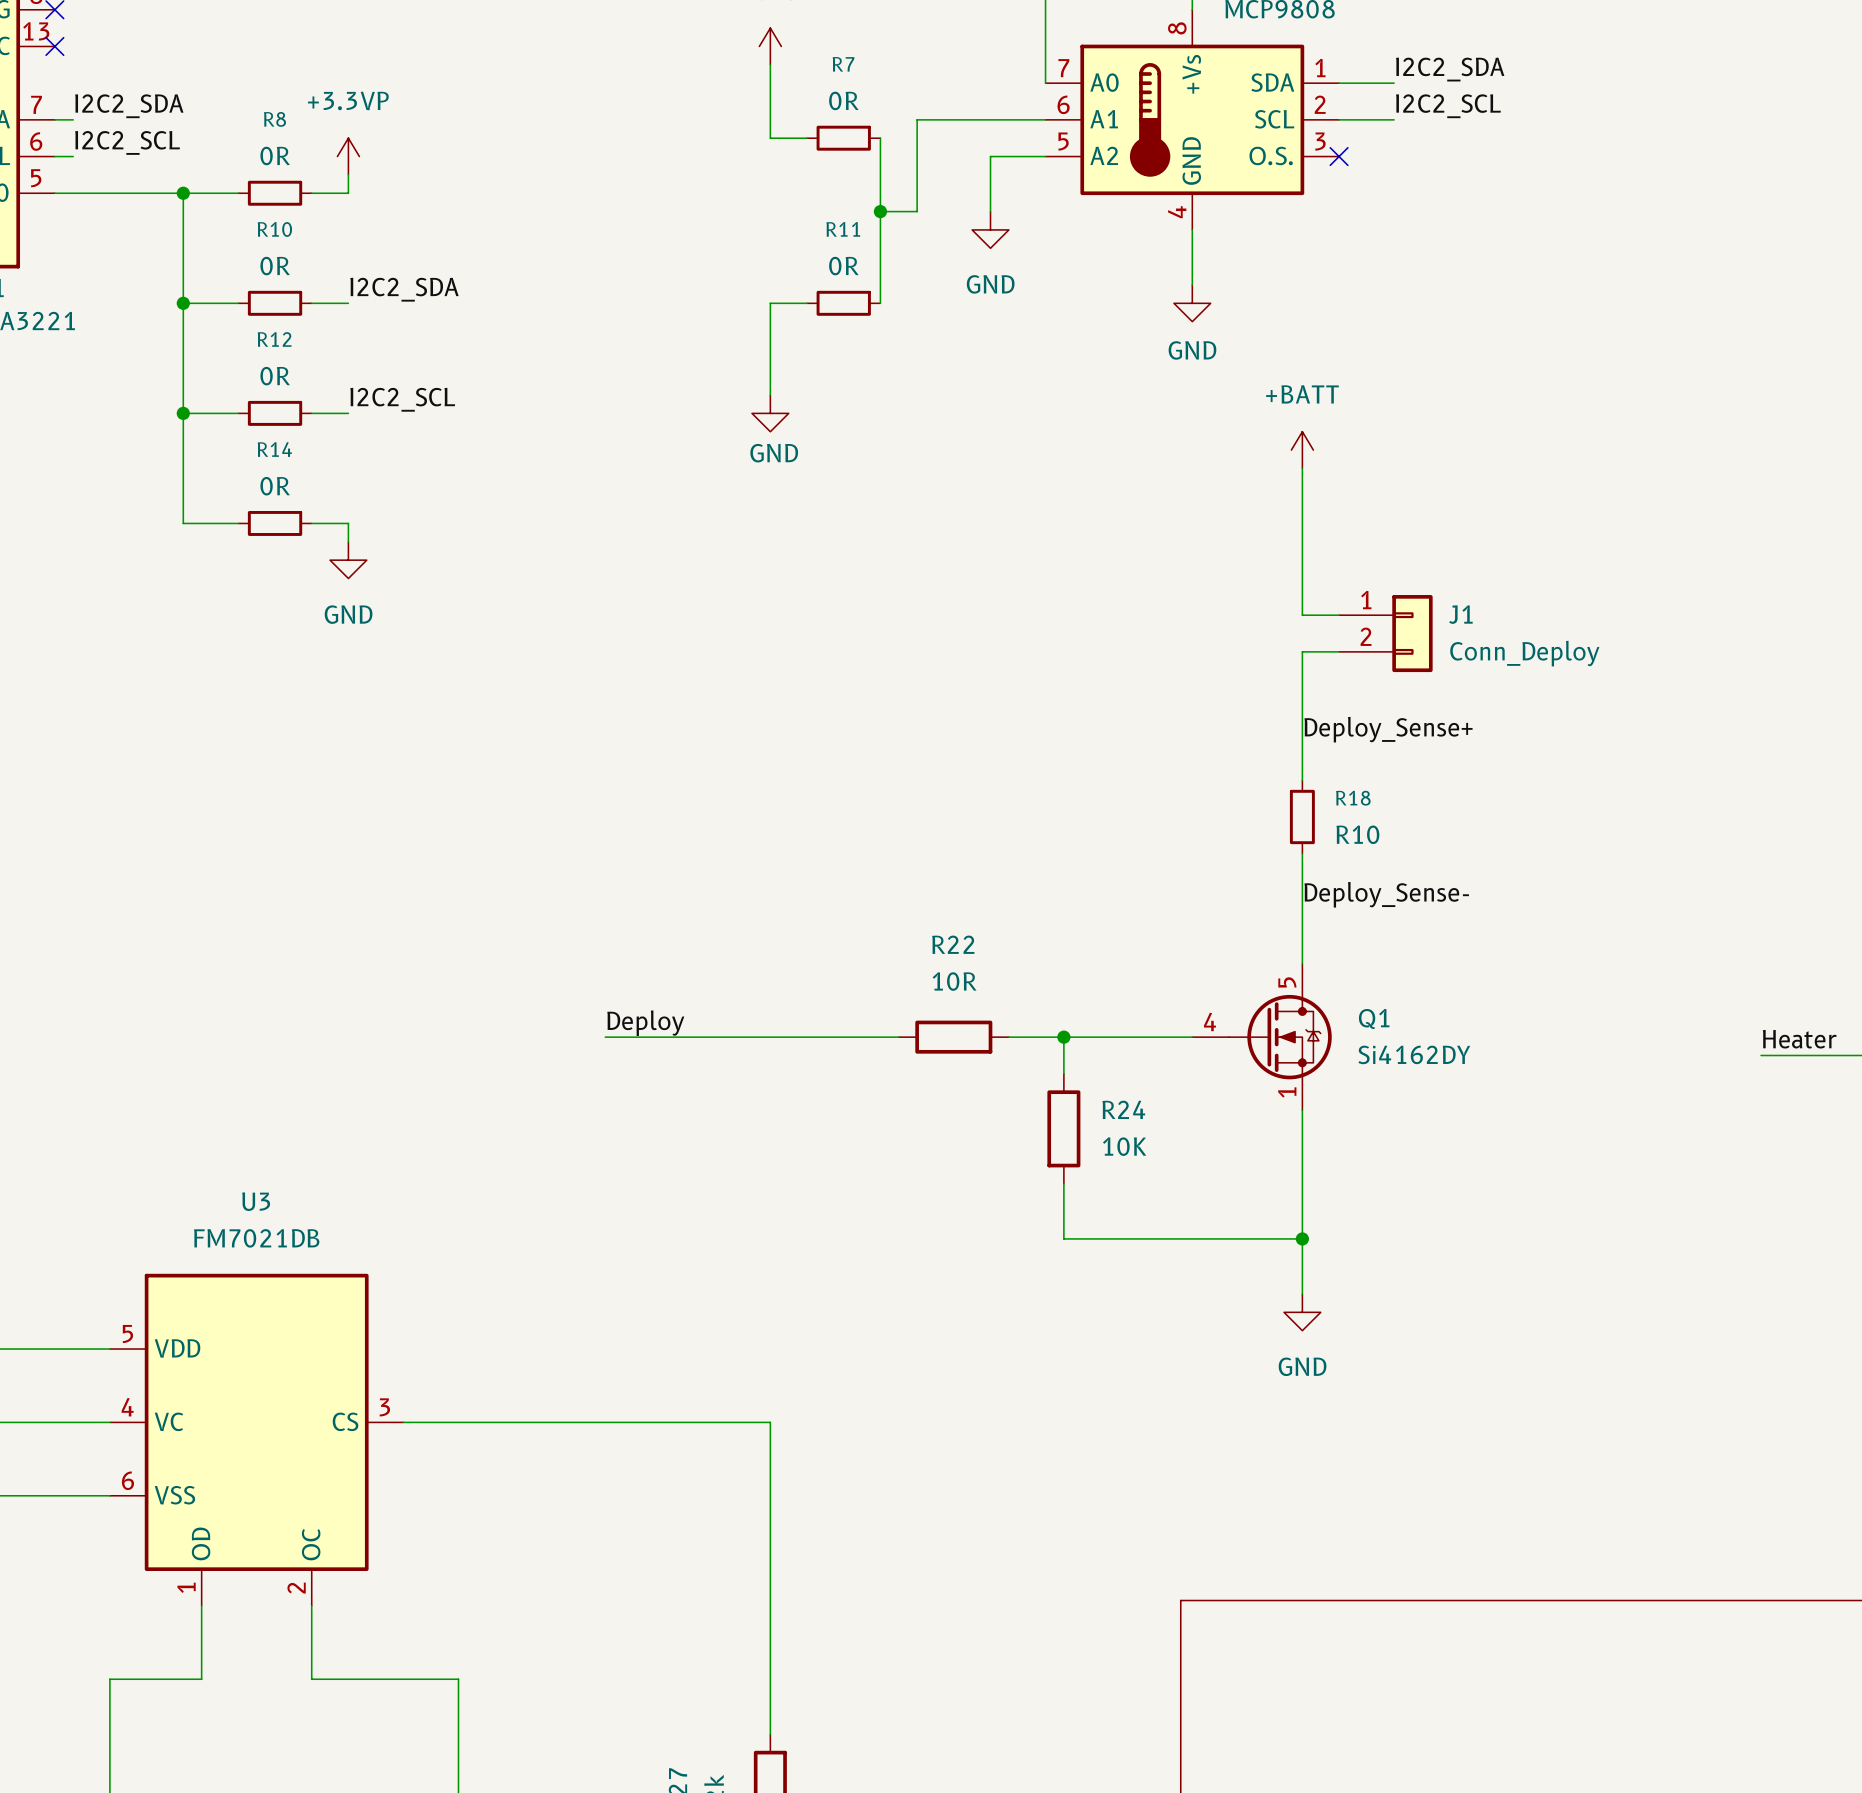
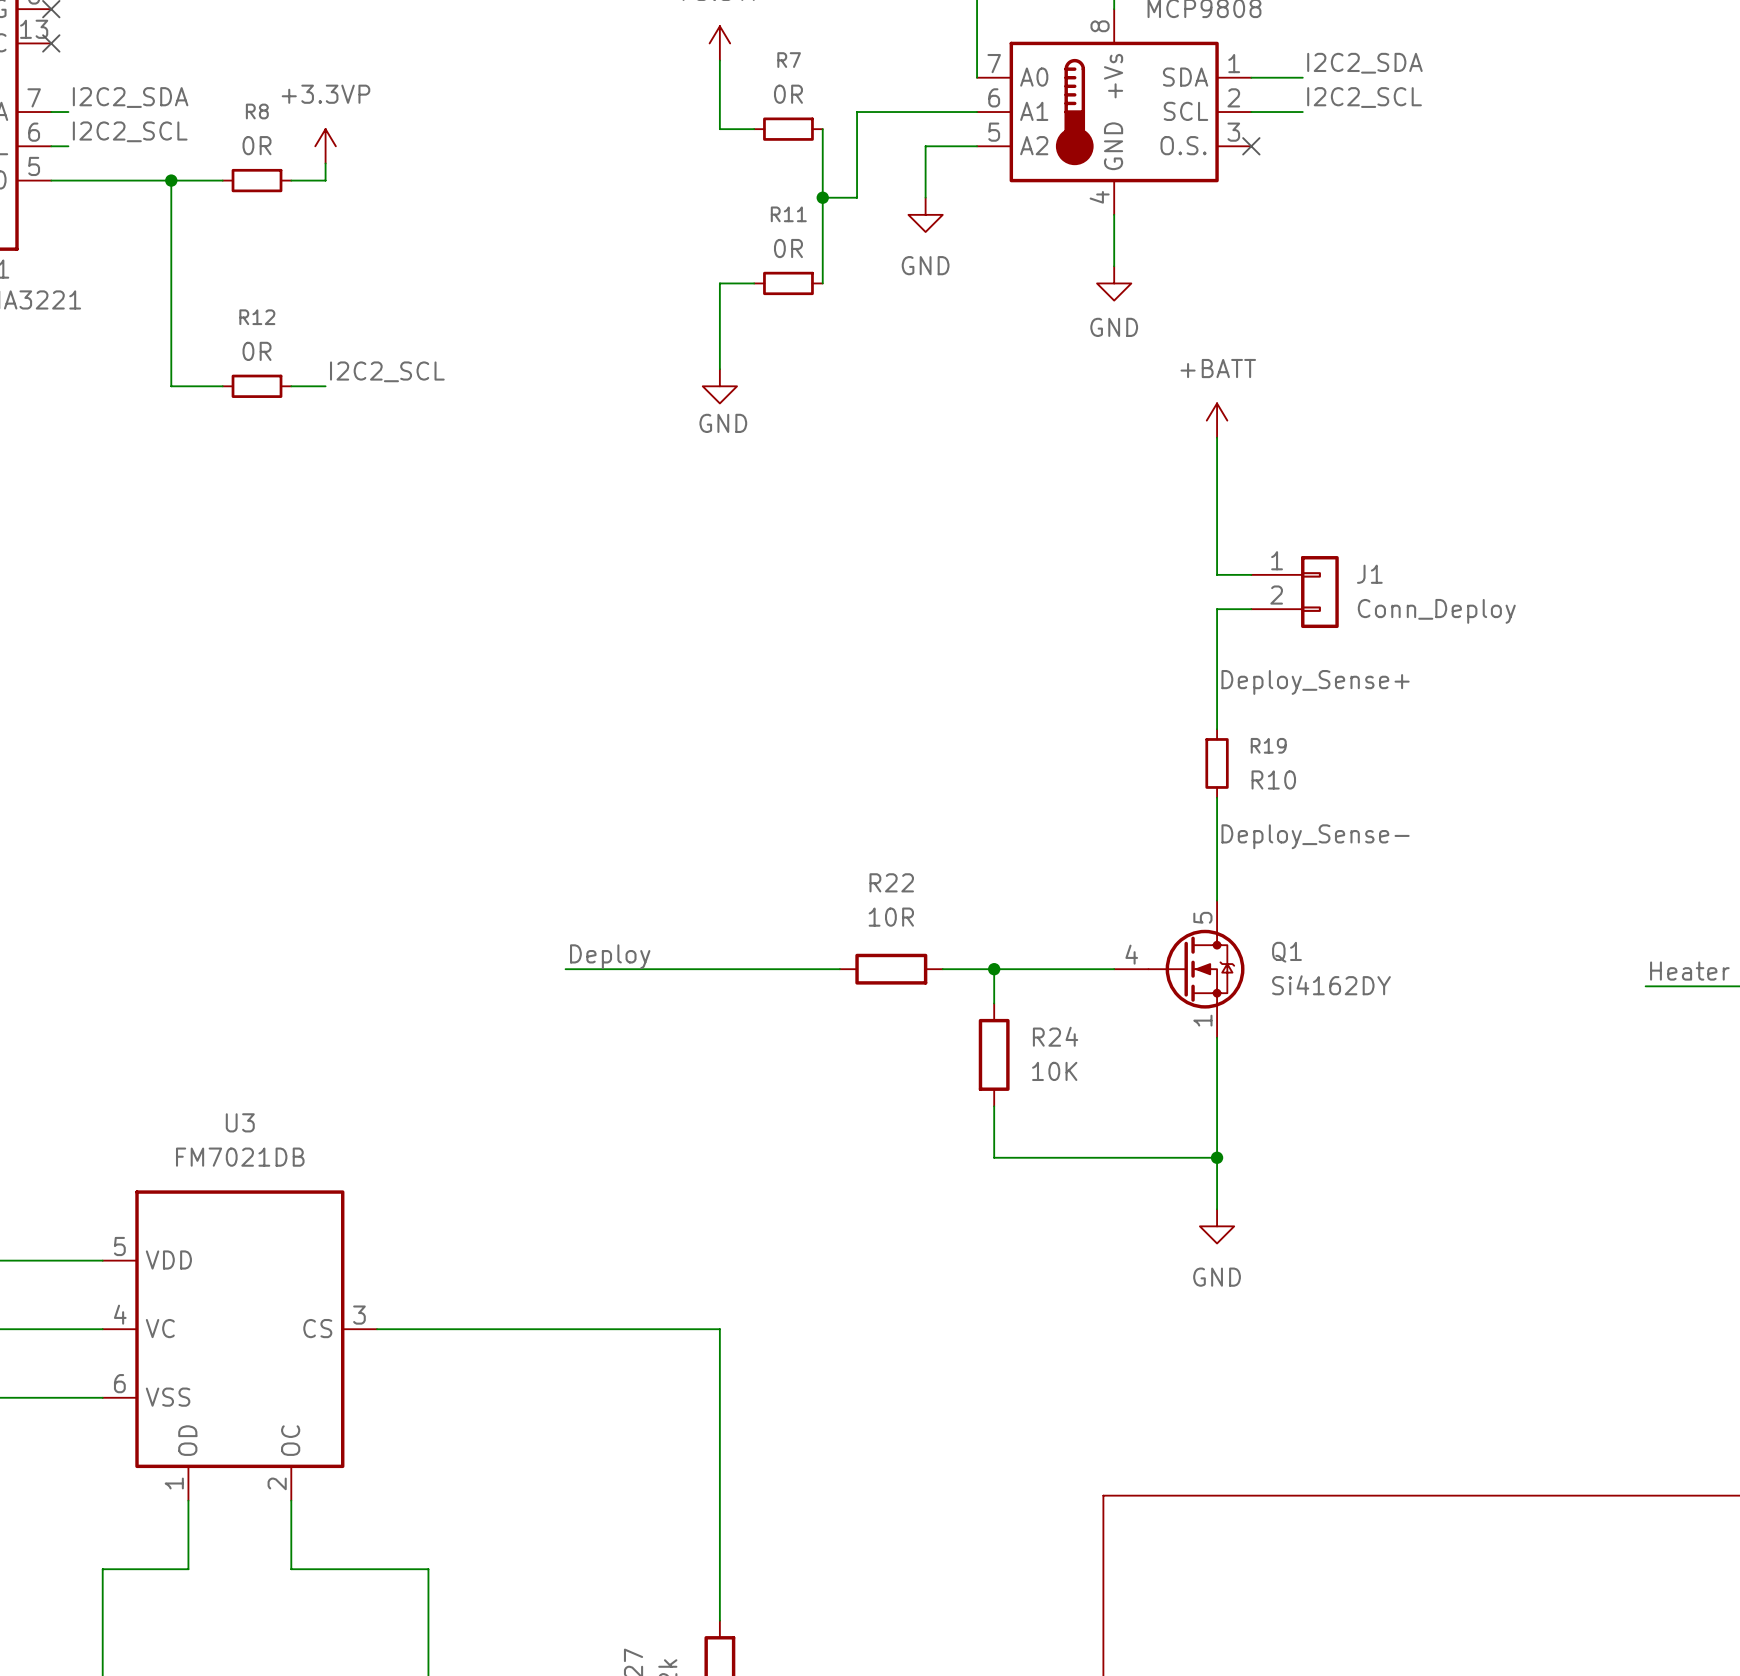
label: I2C2_SDA (404, 289) -> none
wire: (183, 303) (238, 303) -> none
junction: (183, 303) -> none
R10: 0R (275, 303) -> none
wire: (311, 303) (348, 303) -> none
wire: (183, 413) (183, 523) (238, 523) -> none
junction: (183, 413) -> none
R14: 0R (275, 523) -> none
wire: (311, 523) (348, 523) (348, 541) -> none
power symbol: GND (348, 560) -> none
R18 name: R18 (1353, 798) -> R19 (1268, 745)

